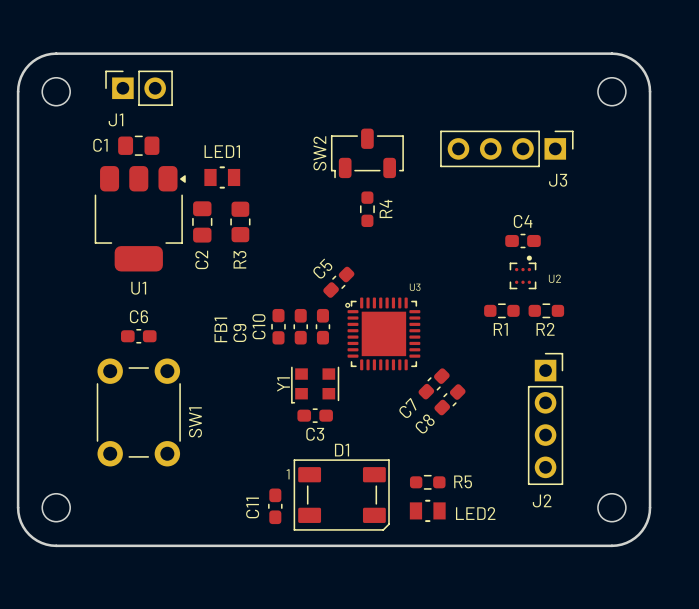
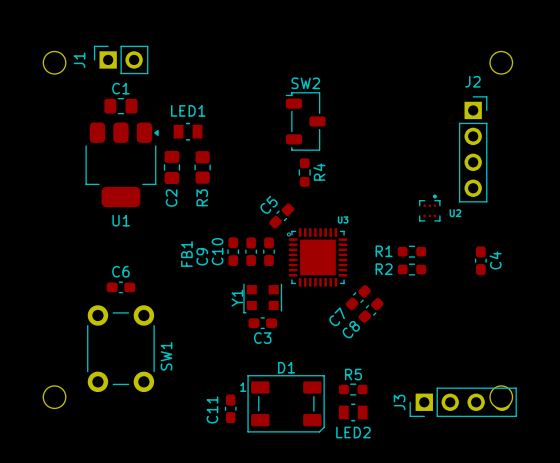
board edge: (56, 53) (611, 53) (621, 54) (635, 61) (644, 72) (650, 91) (650, 507) (648, 517) (642, 530) (626, 542) (611, 545) (56, 545) (46, 544) (33, 537) (23, 526) (18, 507) (18, 91) (21, 77) (29, 64) (41, 56) (56, 53) -> none
J1 name rotation: 0° (115, 119) -> 90° counterclockwise (79, 60)
J1 name position: J1 (115, 119) -> J1 (79, 60)
C1 name position: C1 (100, 145) -> C1 (120, 88)
J3 rotation: 0° (506, 148) -> 180° (463, 402)
J3 position: (506, 148) -> (463, 402)
SW2 rotation: 0° (367, 153) -> 90° clockwise (305, 121)
J3 name position: J3 (558, 180) -> J3 (399, 402)
R4 position: (367, 209) -> (304, 172)
C4 rotation: 0° (523, 240) -> 90° clockwise (480, 260)
C4 position: (523, 240) -> (480, 260)
R1 position: (501, 310) -> (411, 251)
R2 position: (546, 310) -> (411, 269)
R1 name position: R1 (500, 329) -> R1 (384, 251)
R2 name position: R2 (545, 329) -> R2 (384, 269)
C6 position: (138, 336) -> (120, 287)
SW1 position: (138, 412) -> (120, 348)
J2 position: (545, 418) -> (473, 149)
R5 name position: R5 (463, 481) -> R5 (353, 374)
R5 position: (427, 482) -> (353, 389)
D1 position: (341, 495) -> (286, 403)
J2 name position: J2 (542, 500) -> J2 (472, 81)
C11 position: (275, 506) -> (230, 408)
LED2 position: (427, 510) -> (353, 412)
LED2 name position: LED2 (475, 513) -> LED2 (353, 432)

